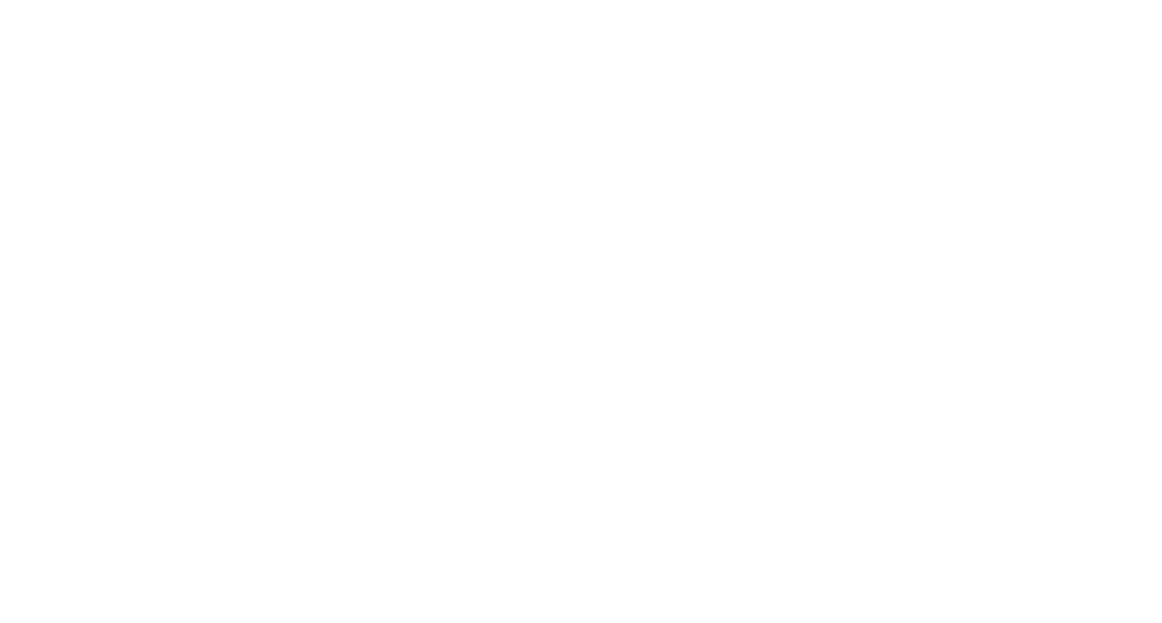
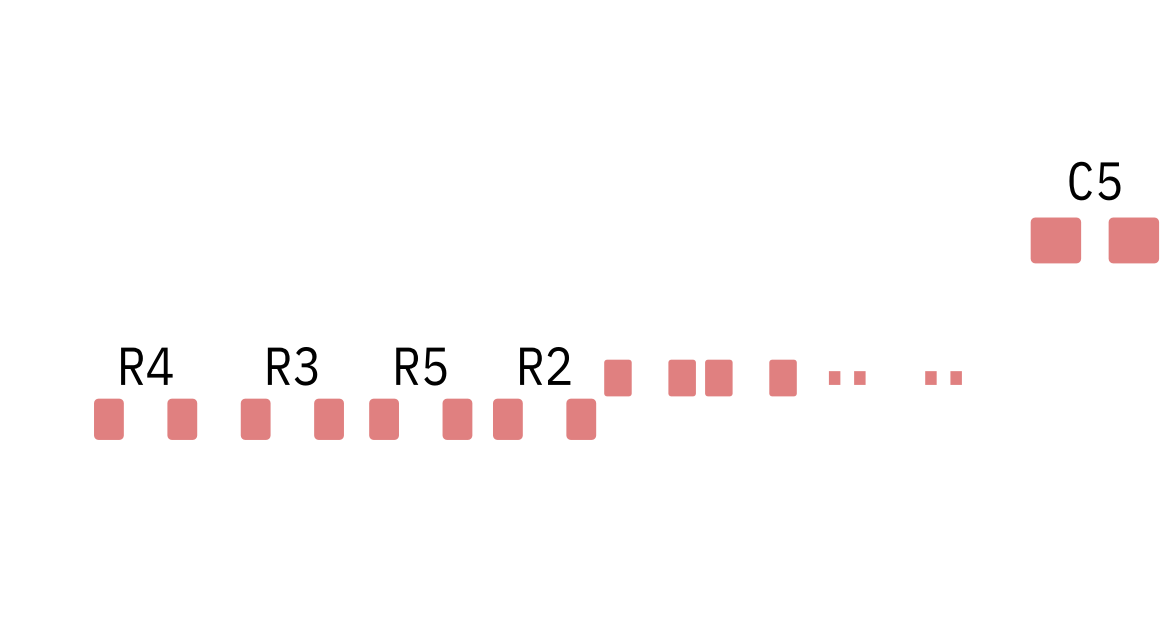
C5: none -> (1094, 240)
part: none -> (650, 378)
part: none -> (750, 378)
part: none -> (847, 378)
part: none -> (943, 378)
R4: none -> (145, 419)
R3: none -> (292, 419)
R5: none -> (420, 419)
R2: none -> (544, 419)

